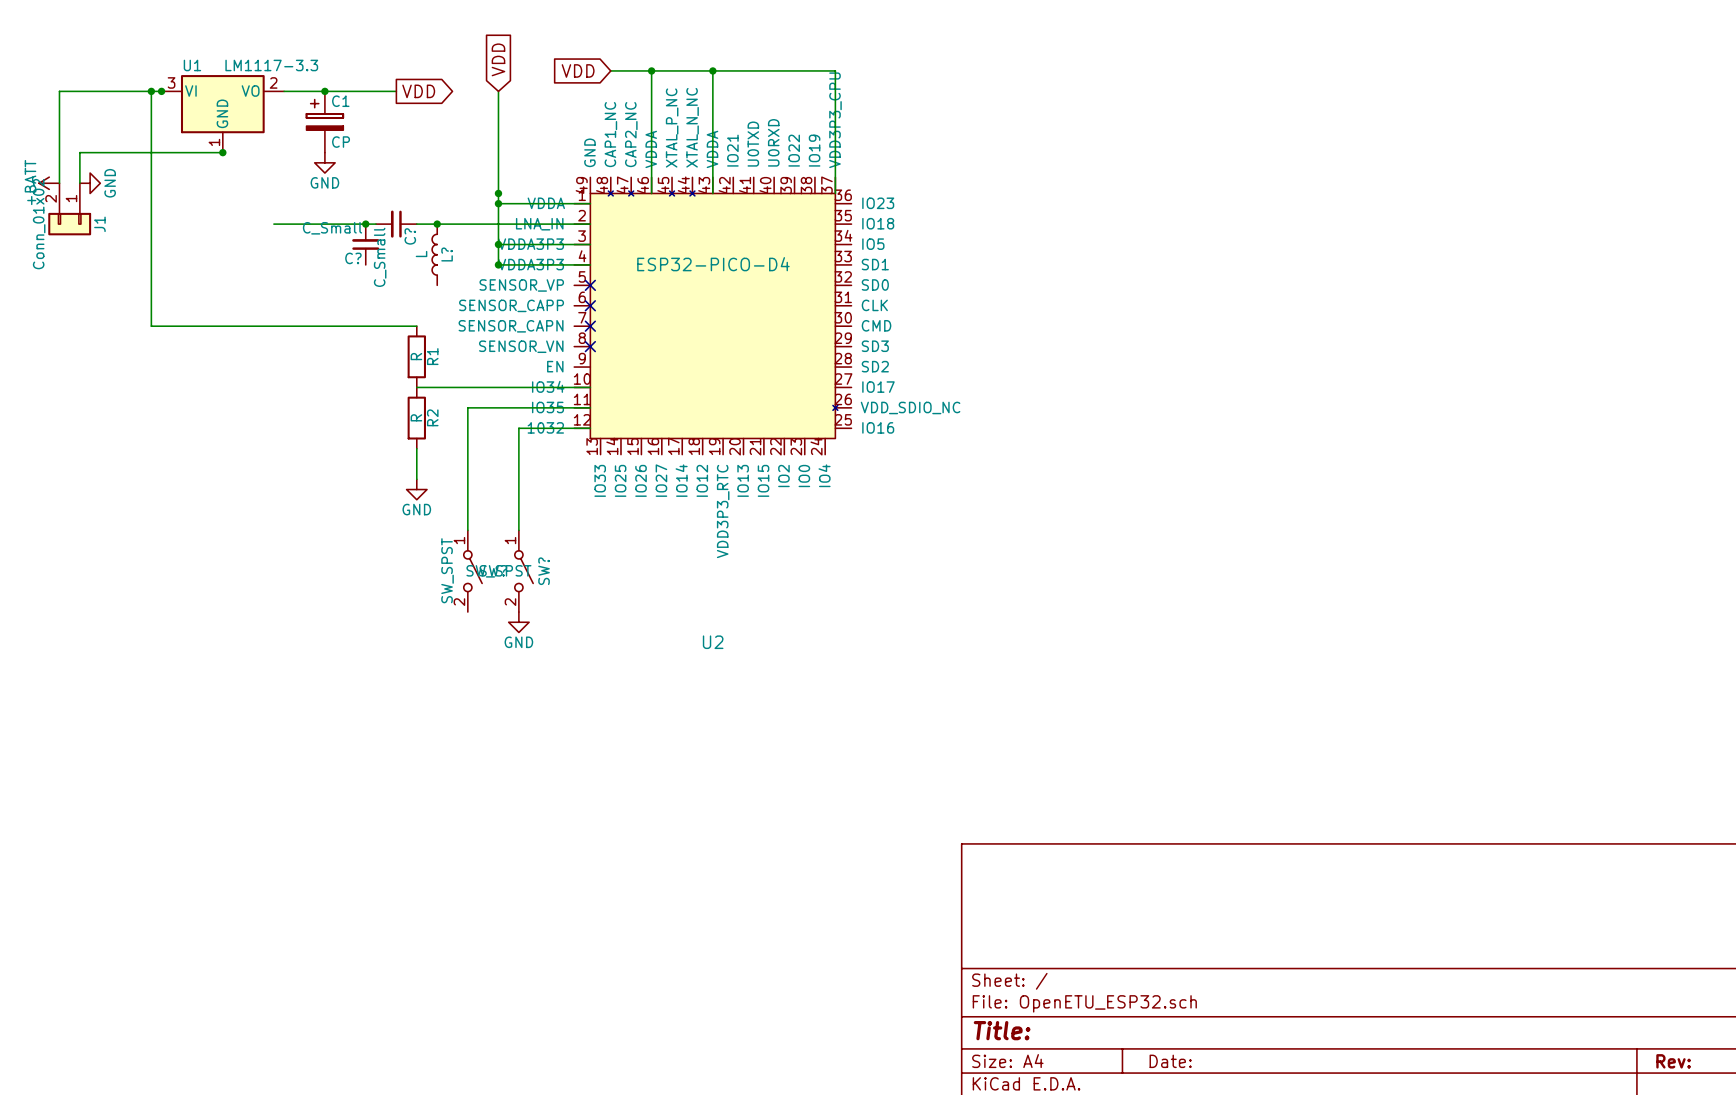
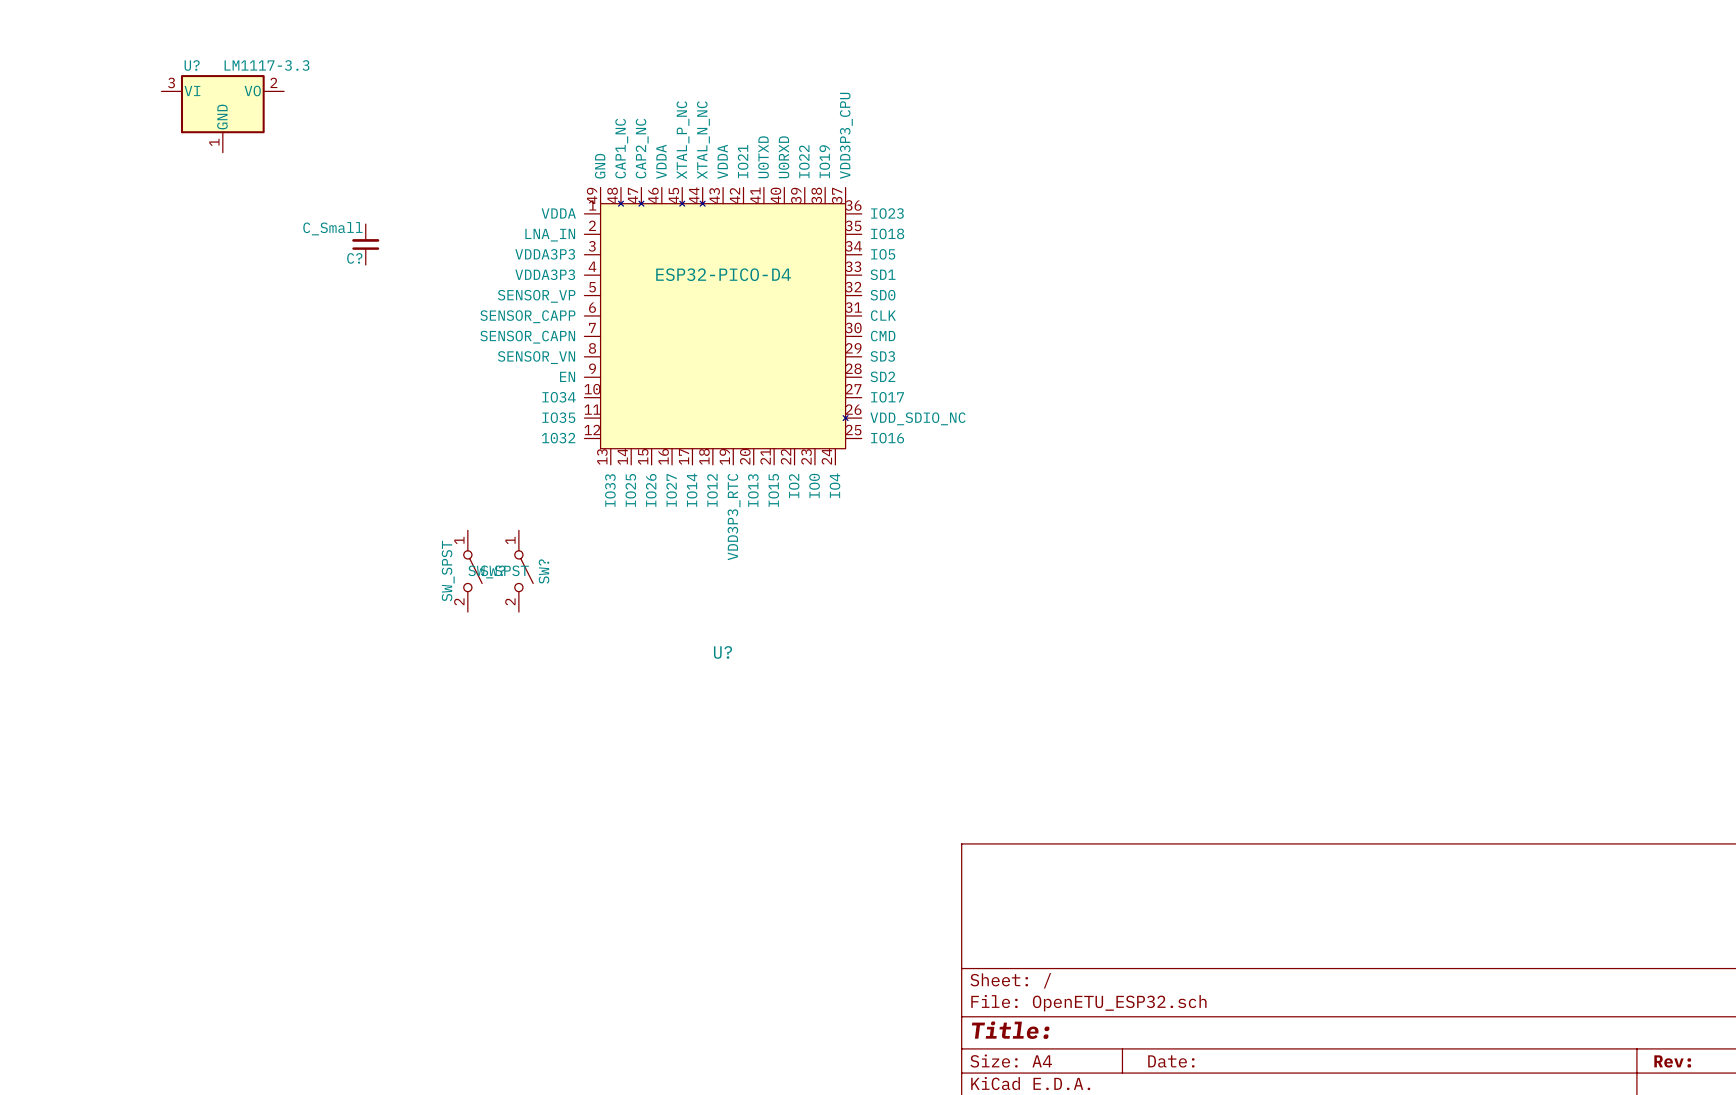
global label: VDD (498, 59) -> none
U1 name: U1 (192, 65) -> U? (192, 65)
global label: VDD (578, 70) -> none
wire: (610, 70) (835, 70) (835, 193) -> none
wire: (651, 70) (651, 193) -> none
junction: (651, 70) -> none
wire: (712, 70) (712, 193) -> none
junction: (712, 70) -> none
wire: (151, 91) (151, 326) (416, 326) -> none
junction: (151, 91) -> none
wire: (161, 91) (59, 91) (59, 183) -> none
junction: (161, 91) -> none
wire: (284, 91) (396, 91) -> none
junction: (324, 91) -> none
global label: VDD (418, 91) -> none
wire: (498, 91) (498, 264) (590, 264) -> none
C1: CP (324, 122) -> none
wire: (222, 152) (79, 152) (79, 183) -> none
junction: (222, 152) -> none
power symbol: GND (324, 162) -> none
power symbol: +BATT (49, 183) -> none
power symbol: GND (90, 183) -> none
junction: (498, 193) -> none
wire: (498, 203) (590, 203) -> none
junction: (498, 203) -> none
J1: Conn_01x02 (69, 209) -> none
wire: (273, 224) (375, 224) -> none
junction: (365, 224) -> none
C?: C_Small (396, 224) -> none
wire: (416, 224) (590, 224) -> none
junction: (437, 224) -> none
wire: (498, 244) (590, 244) -> none
junction: (498, 244) -> none
L?: L (434, 254) -> none
junction: (498, 264) -> none
no-connect mark: (590, 285) -> none
no-connect mark: (590, 305) -> none
U2: ESP32-PICO-D4 (712, 315) -> none
no-connect mark: (590, 326) -> none
U?: none -> ESP32-PICO-D4 (723, 326)
no-connect mark: (590, 346) -> none
R1: R (416, 356) -> none
wire: (416, 387) (590, 387) -> none
wire: (590, 407) (467, 407) (467, 530) -> none
R2: R (416, 418) -> none
wire: (590, 428) (518, 428) (518, 530) -> none
wire: (416, 448) (416, 479) -> none
power symbol: GND (416, 489) -> none
power symbol: GND (518, 622) -> none

